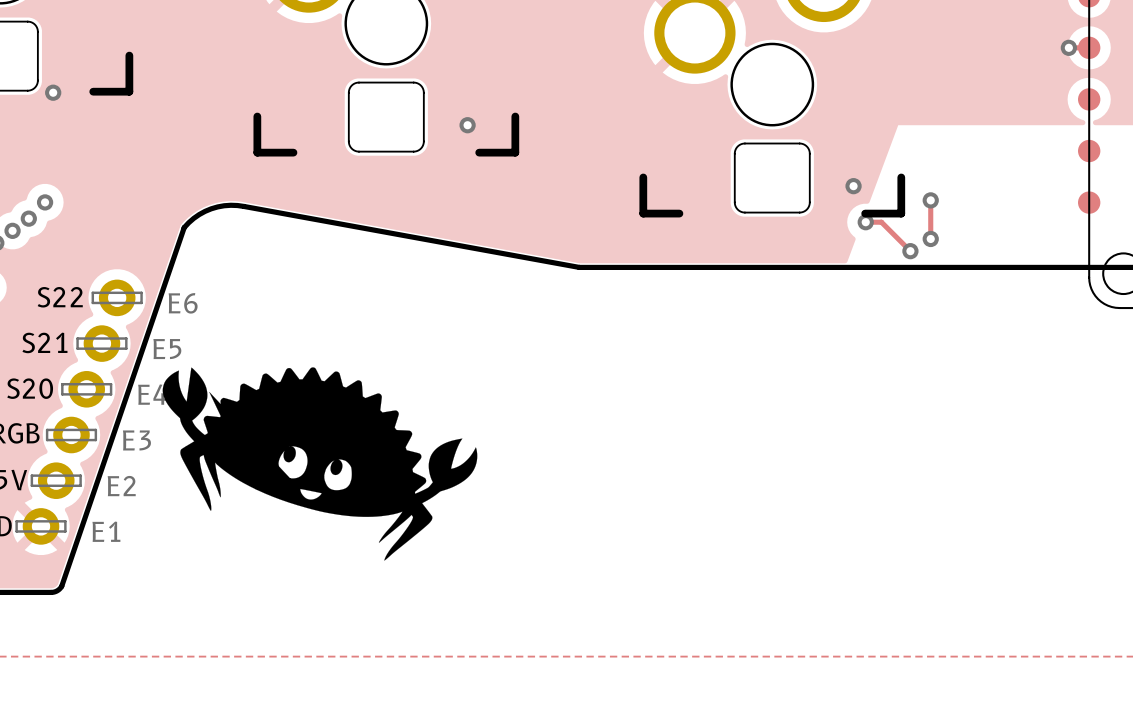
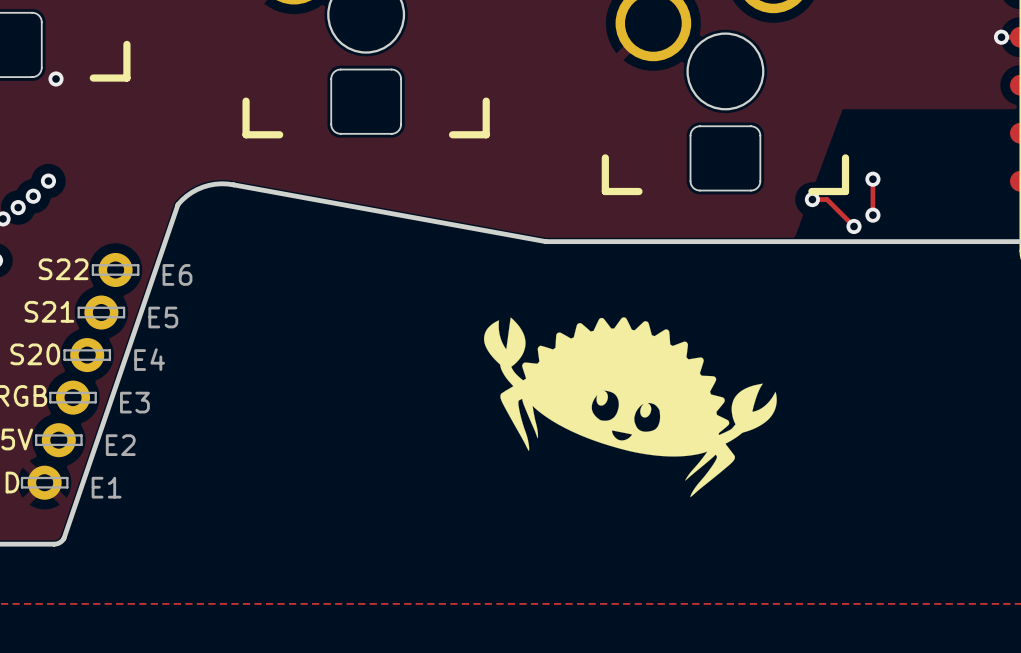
via: (467, 125) -> none
via: (853, 186) -> none
drawing: none -> [483, 317, 777, 498]
drawing: [162, 367, 478, 561] -> none

